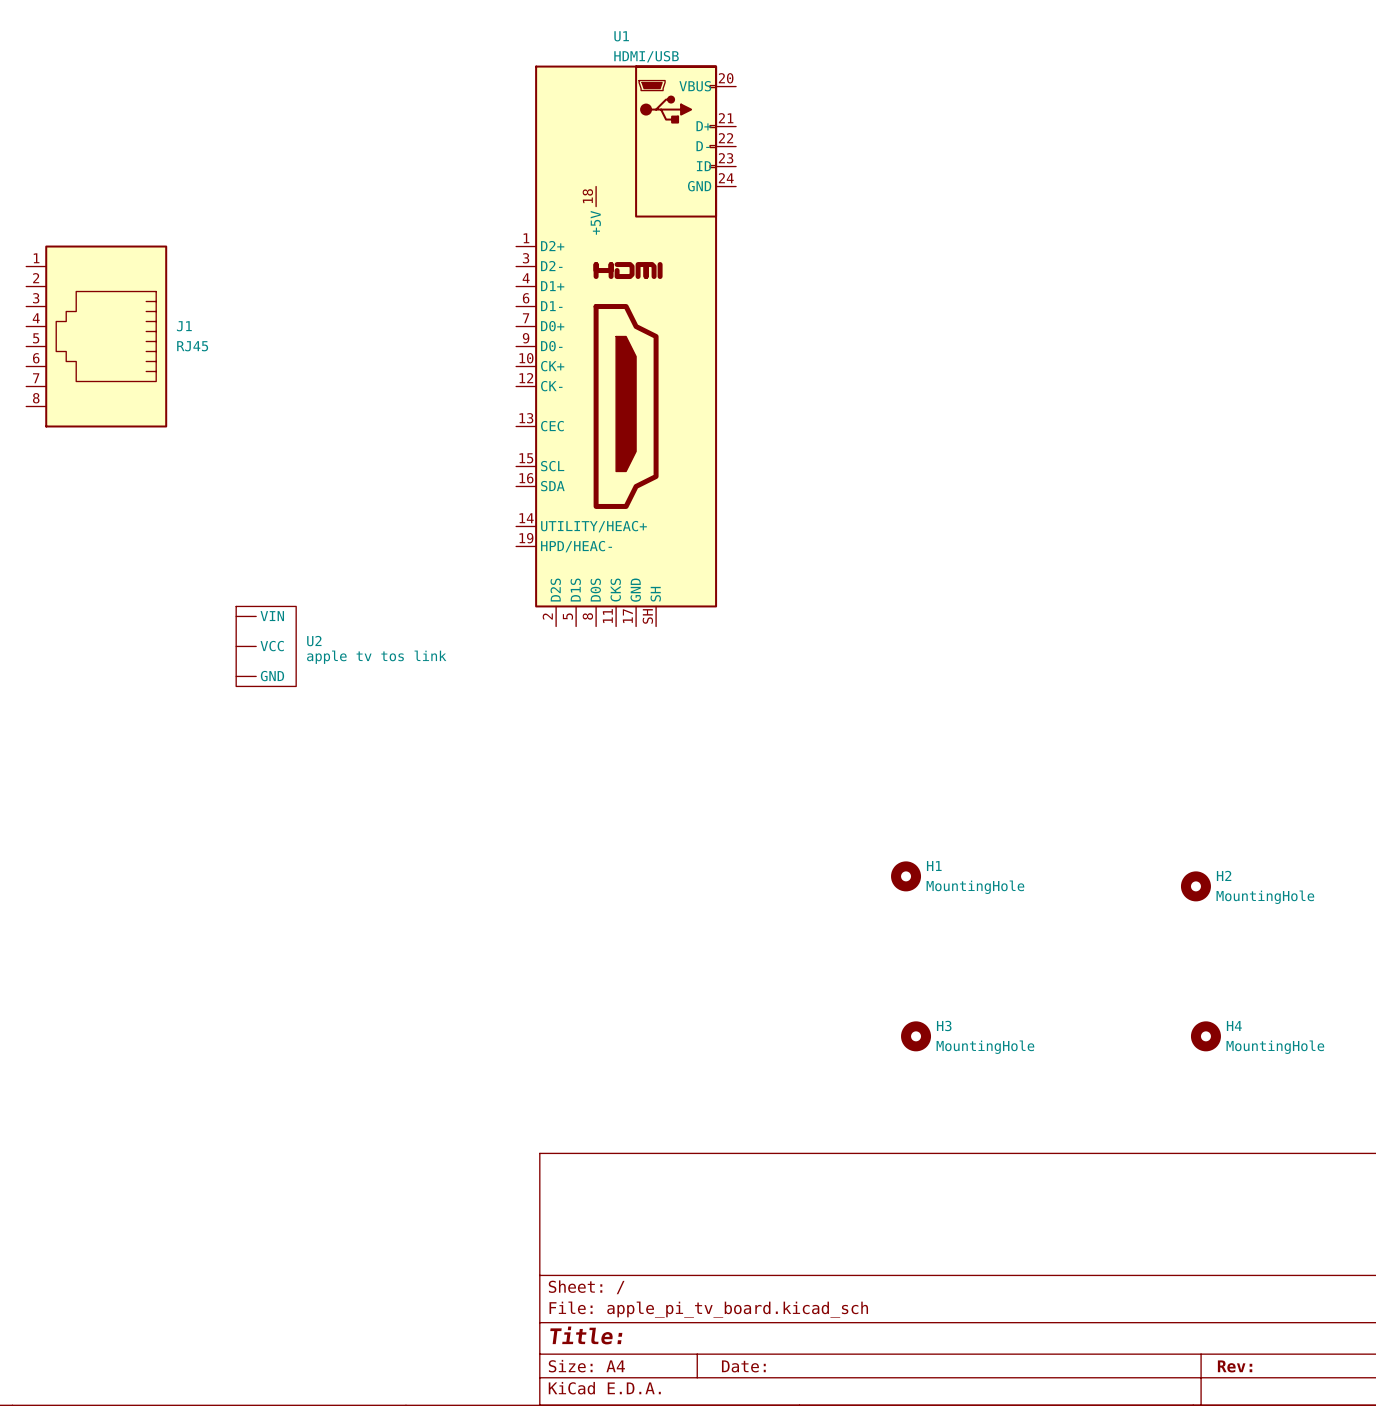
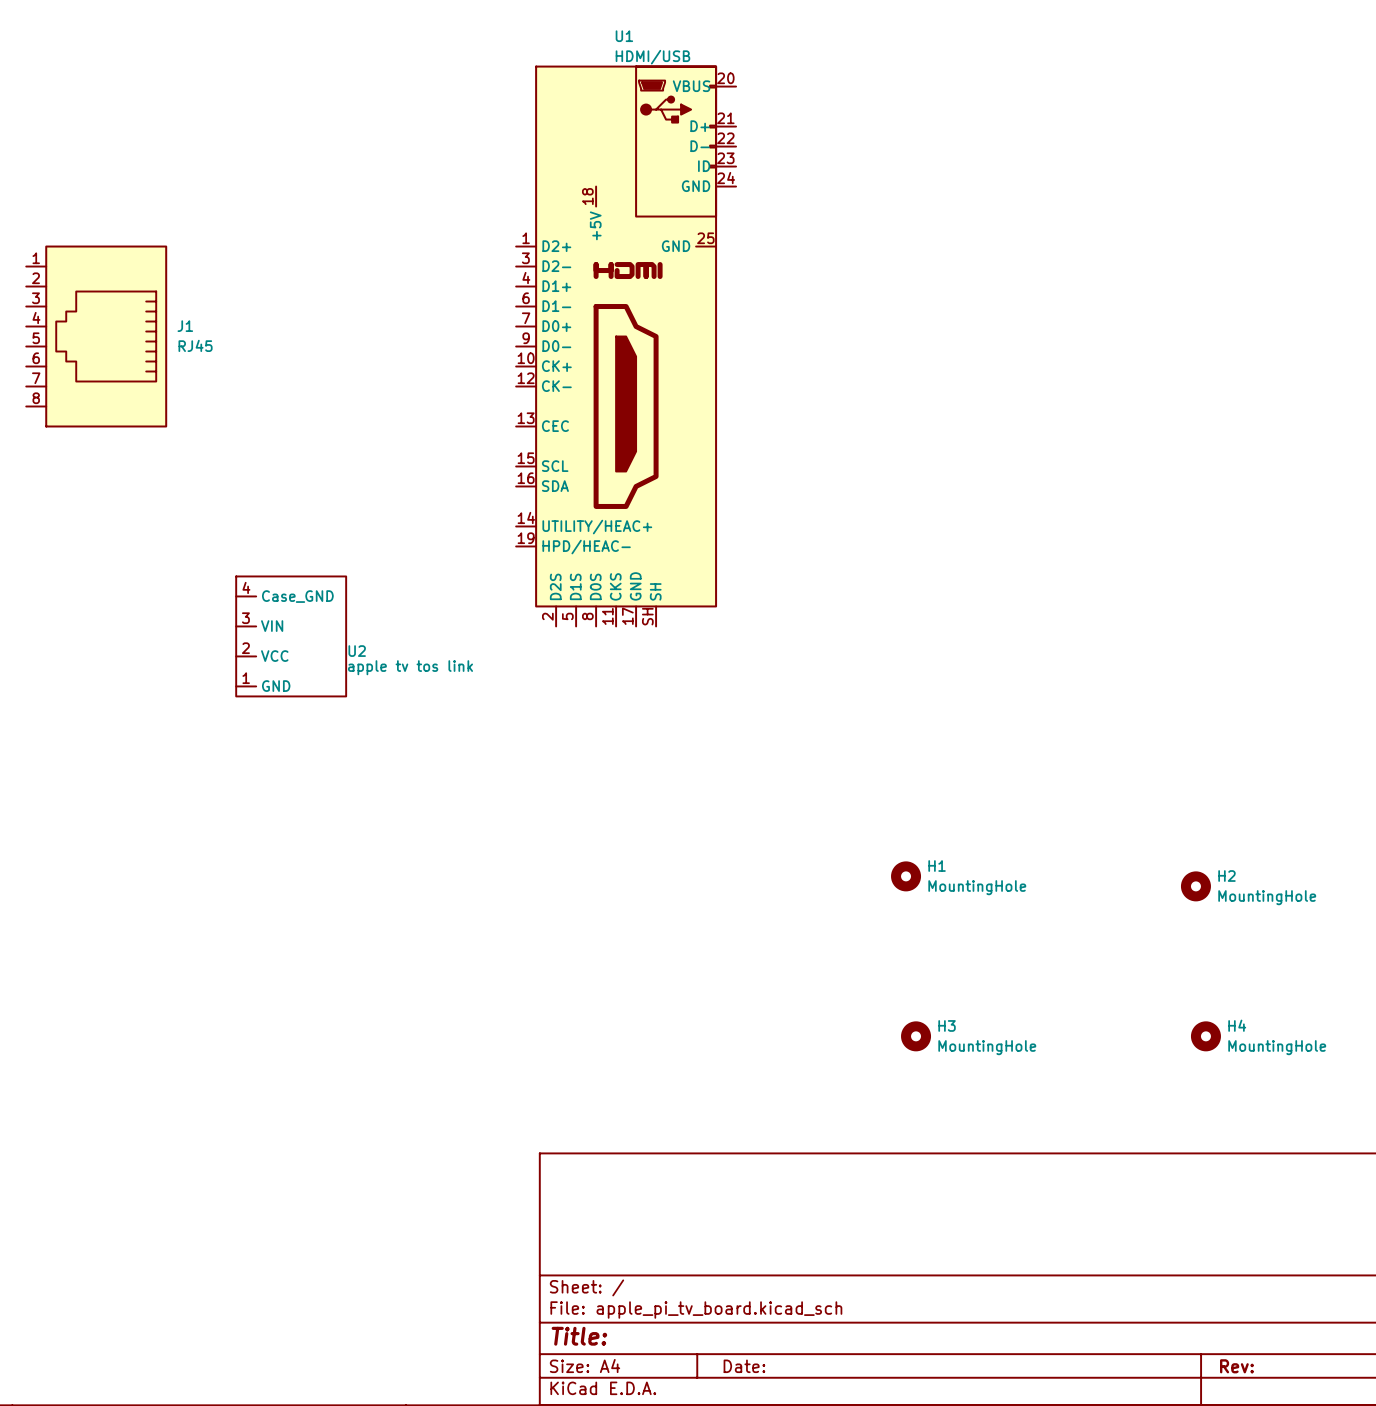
U1 symbol: [516, 65, 737, 627] -> [516, 65, 737, 627]
U2 symbol: [236, 606, 297, 687] -> [236, 576, 347, 697]
U2 name position: U2 (314, 641) -> U2 (357, 651)
U2 value position: apple tv tos link (376, 657) -> apple tv tos link (410, 667)

